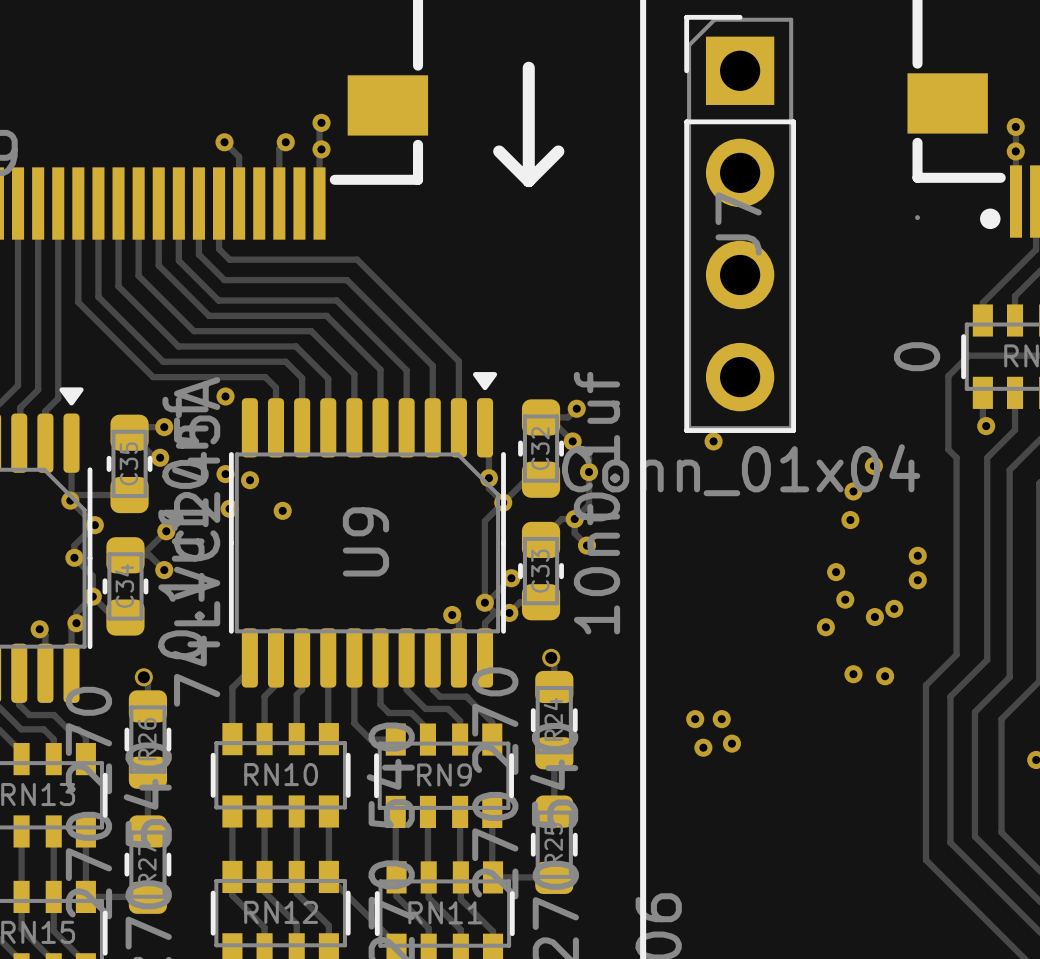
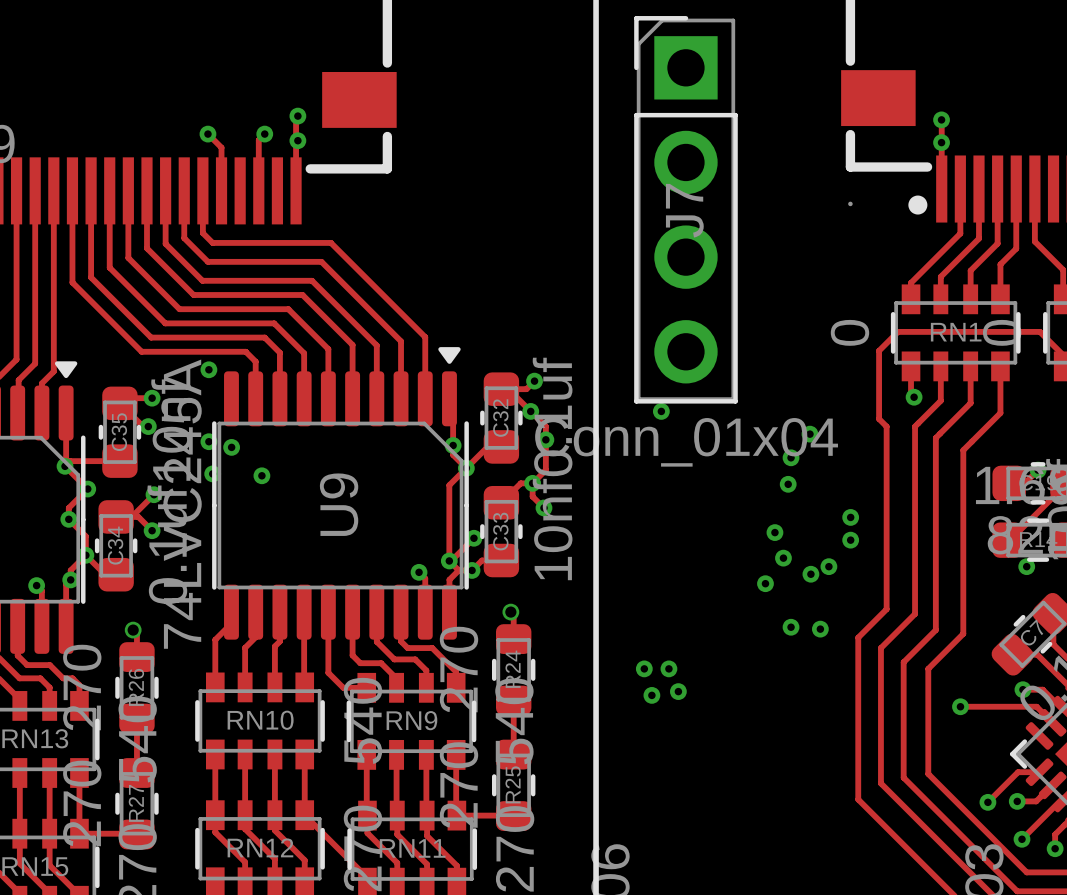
line: (528, 67) (528, 181) -> none
line: (499, 151) (528, 181) -> none
line: (558, 151) (528, 181) -> none

